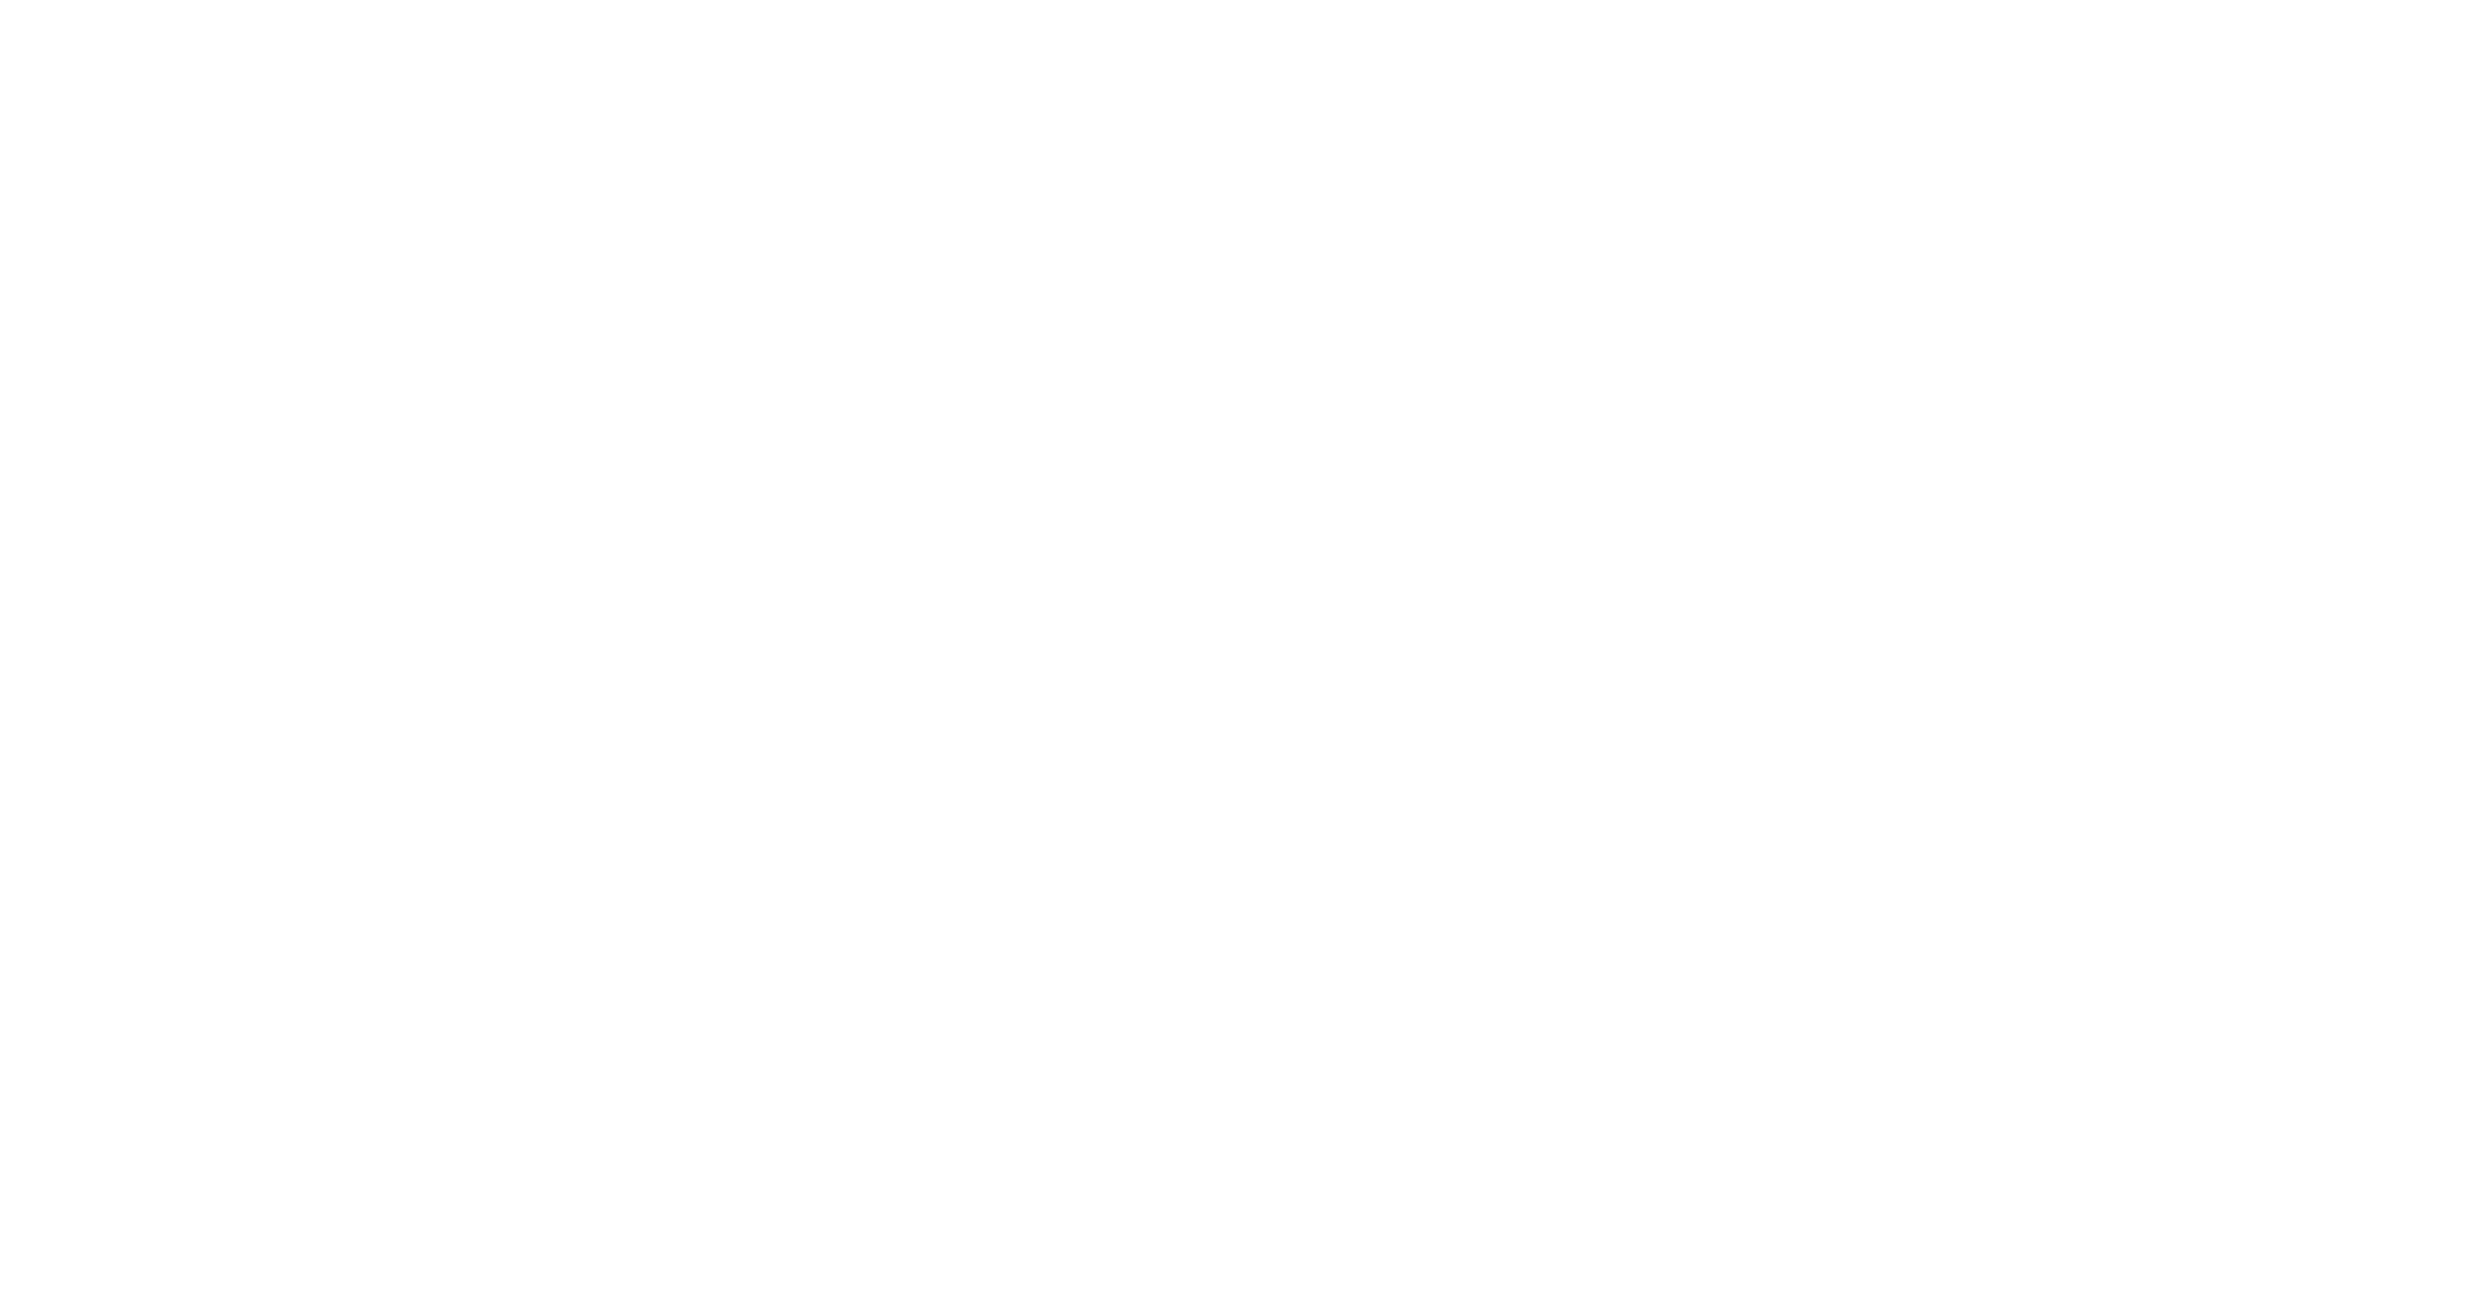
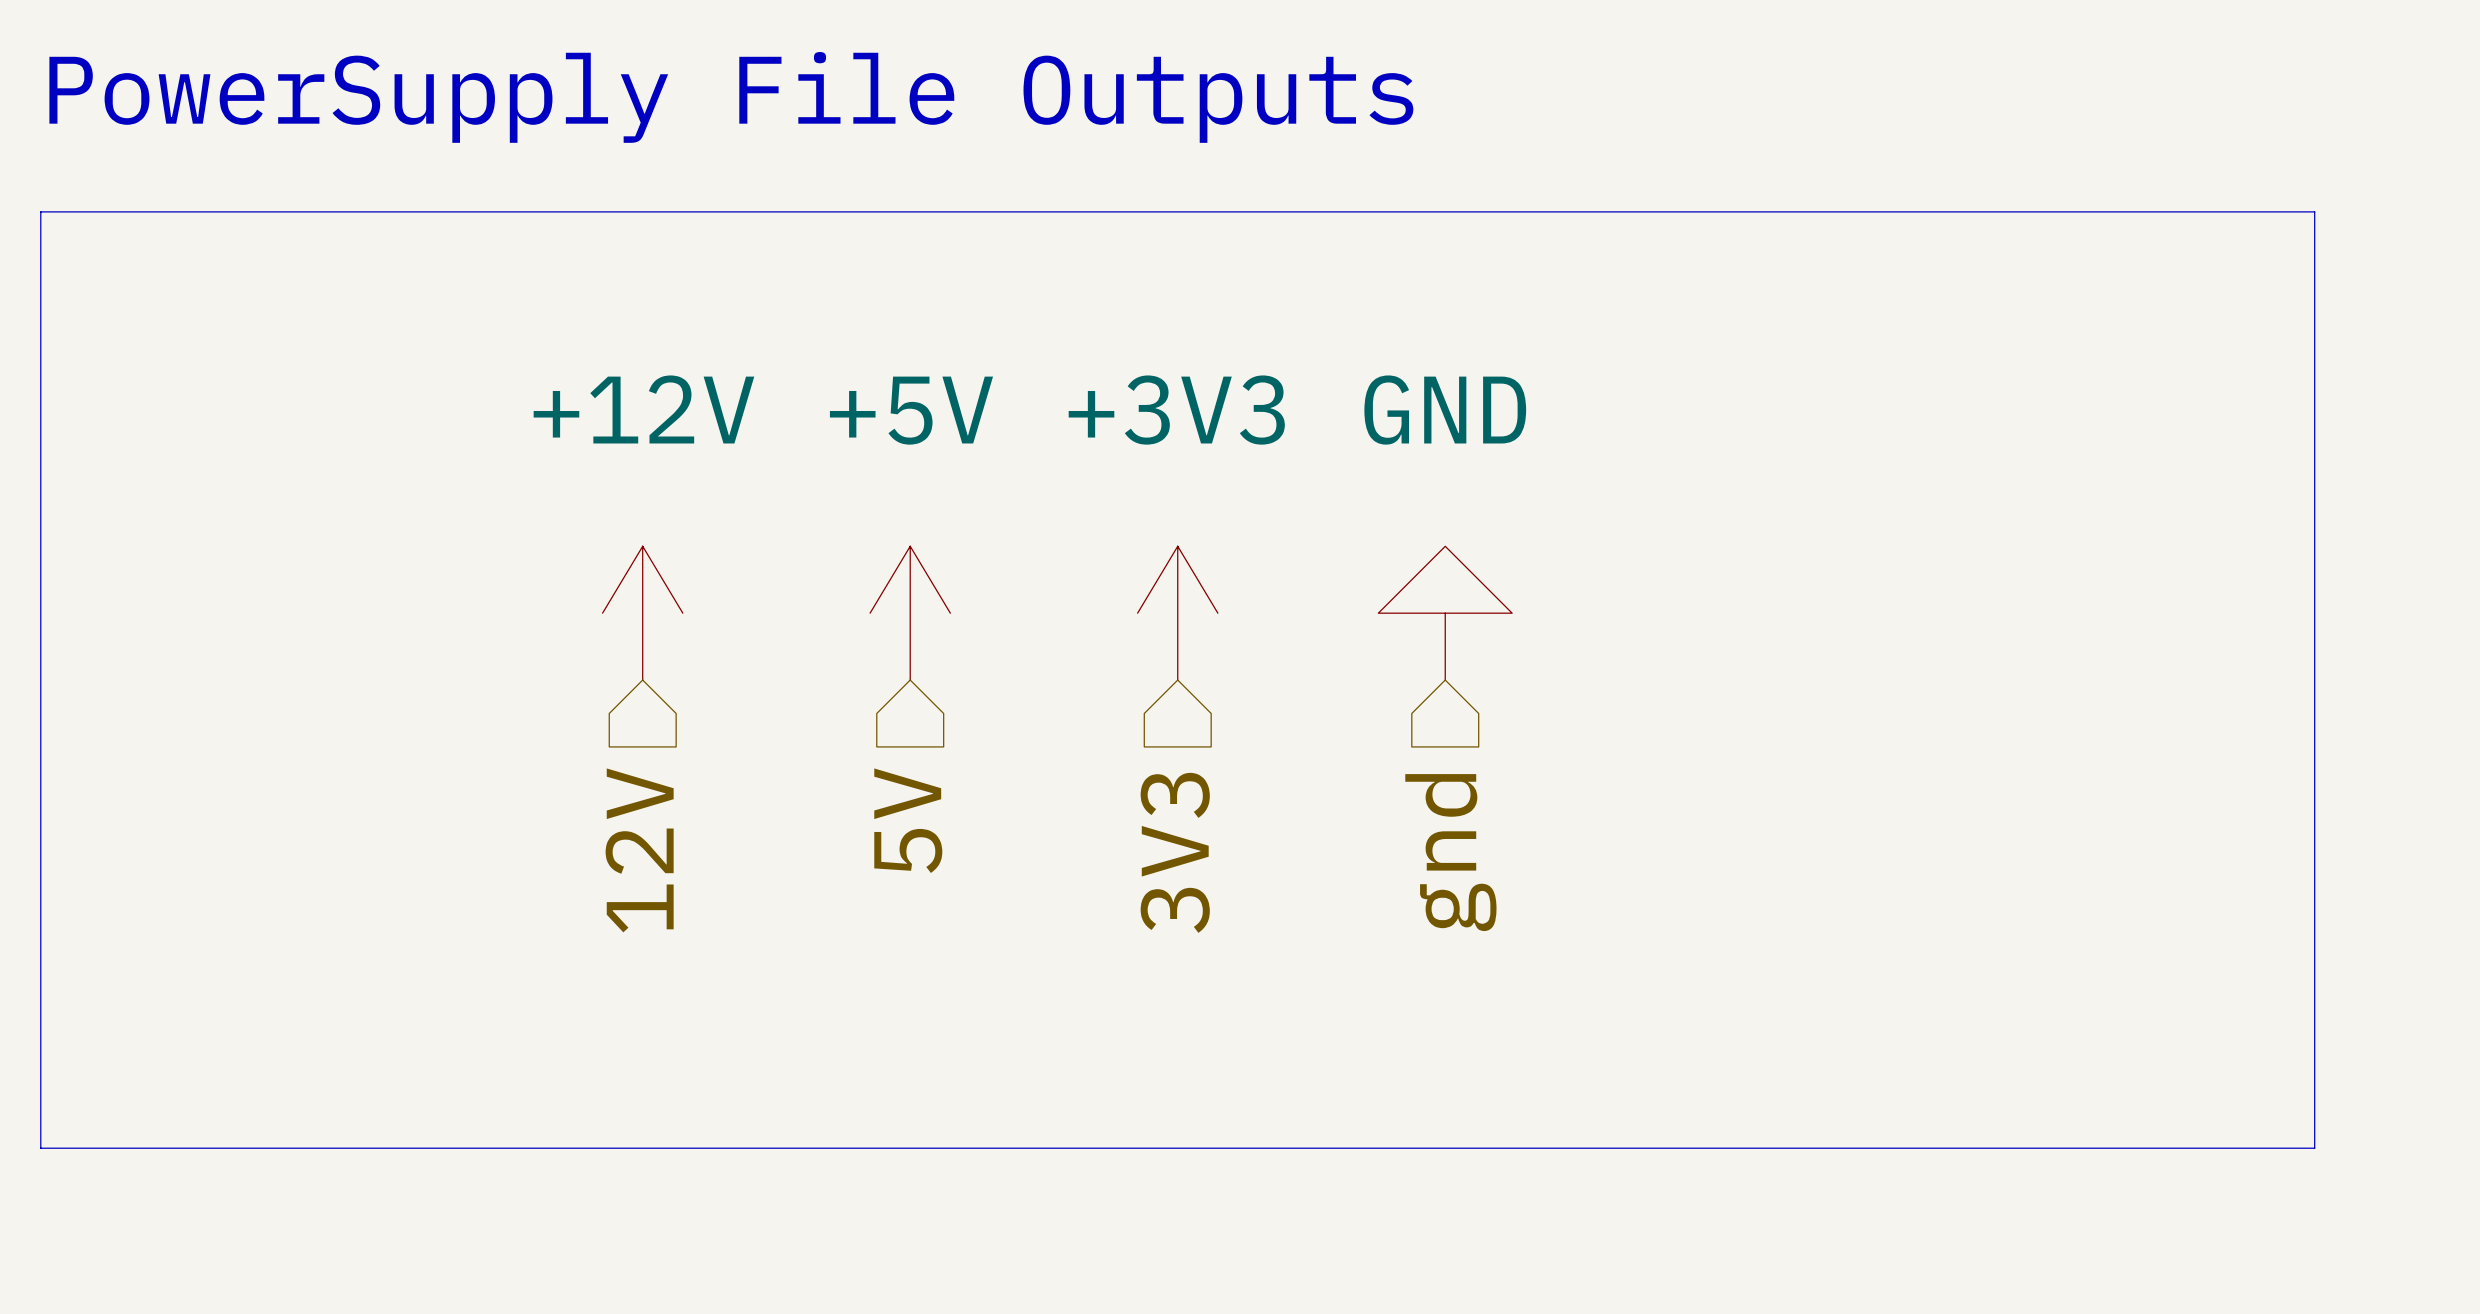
text: none -> PowerSupply File Outputs (731, 97)
line: none -> (40, 211) (2314, 211) (2314, 1148) (40, 1148) (40, 211)
power symbol: none -> +12V (642, 613)
power symbol: none -> +5V (910, 613)
power symbol: none -> +3V3 (1177, 613)
power symbol: none -> GND (1445, 613)
hierarchical label: none -> 5V (908, 820)
hierarchical label: none -> 12V (639, 850)
hierarchical label: none -> gnd (1450, 852)
hierarchical label: none -> 3V3 (1175, 852)

